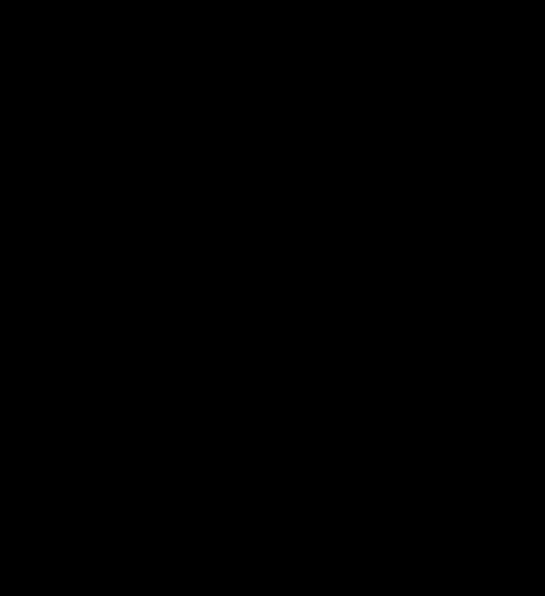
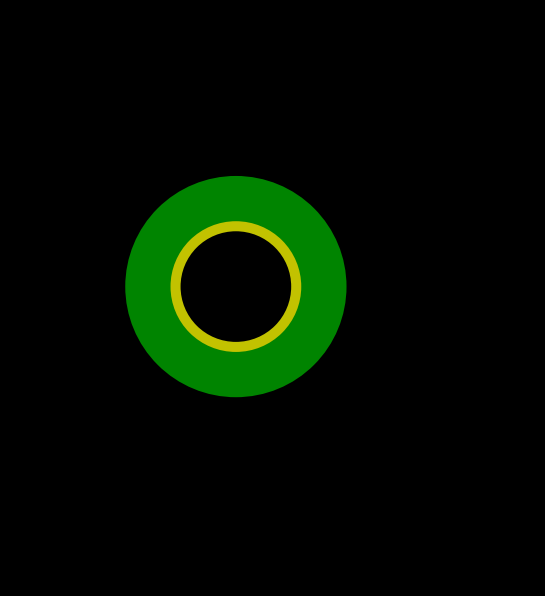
part: none -> (235, 286)

